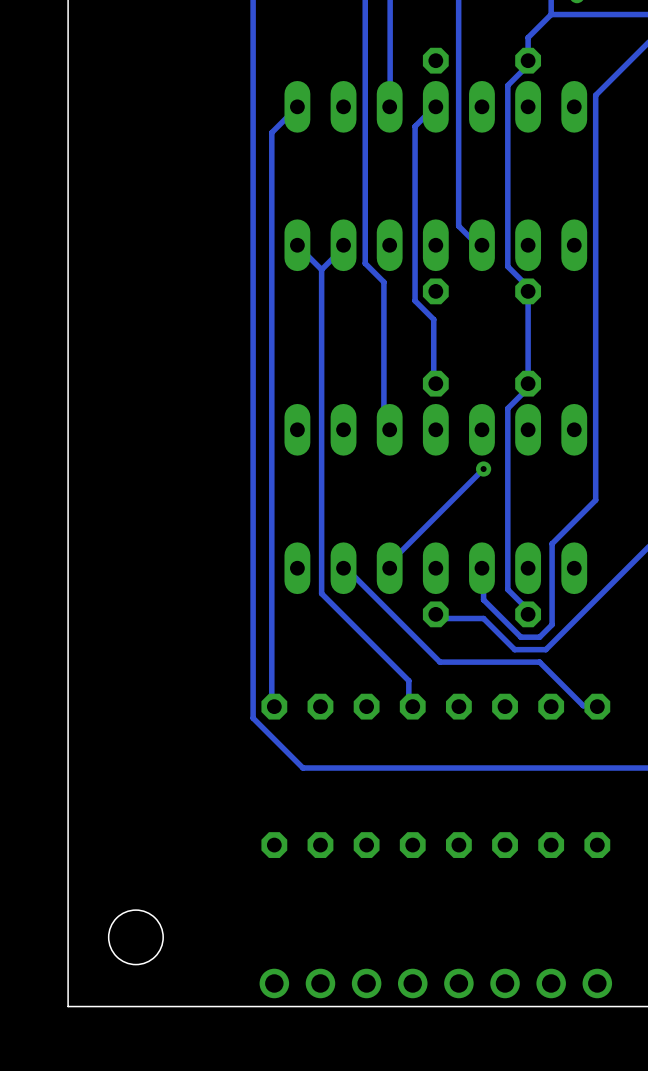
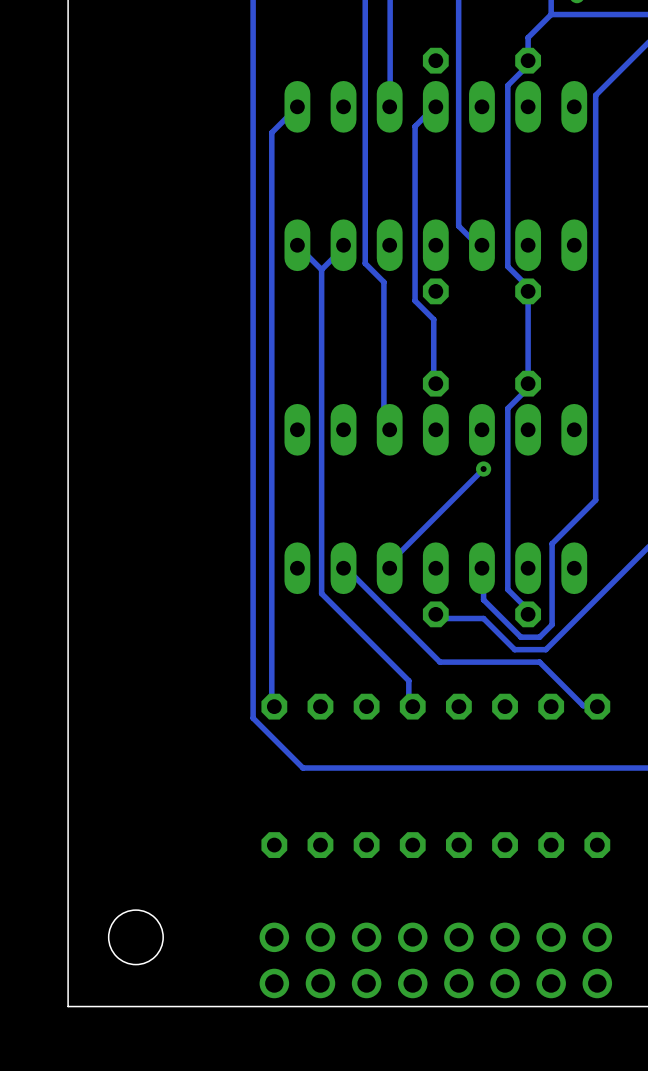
part: none -> (274, 937)
part: none -> (320, 937)
part: none -> (366, 937)
part: none -> (412, 937)
part: none -> (458, 937)
part: none -> (505, 937)
part: none -> (551, 937)
part: none -> (597, 937)

